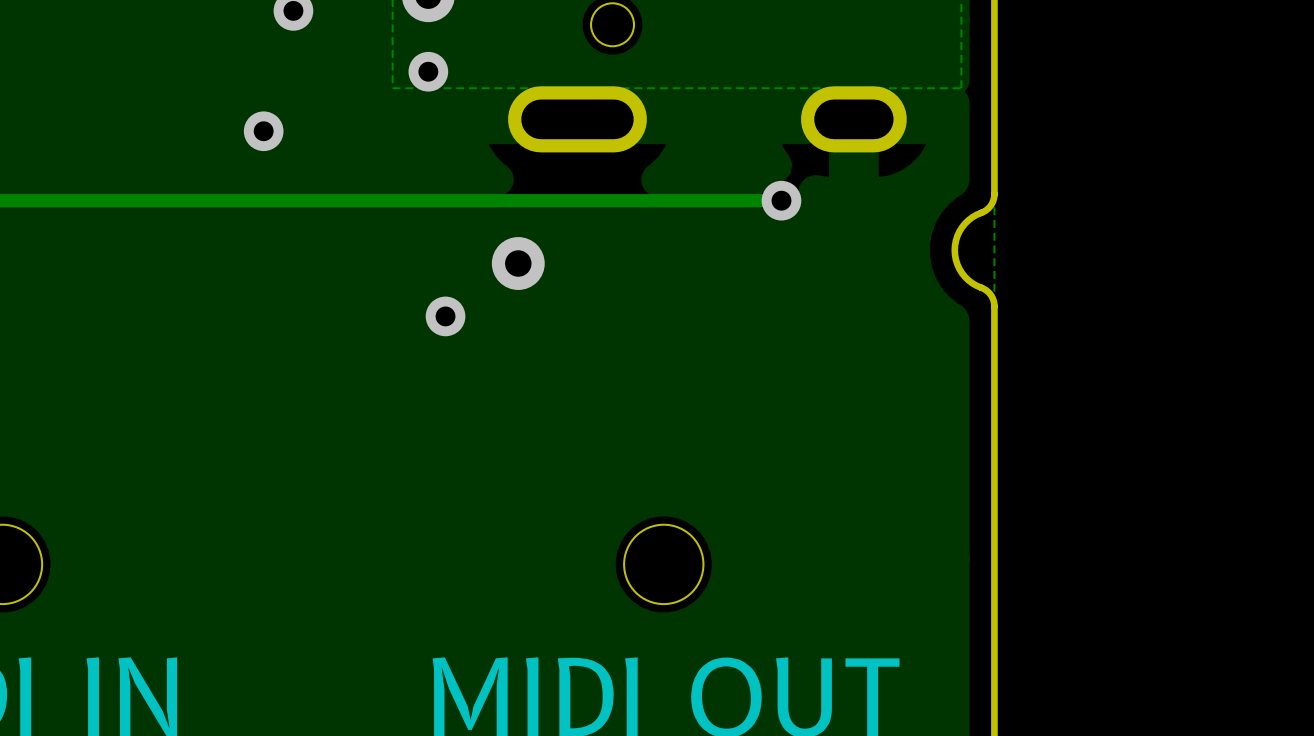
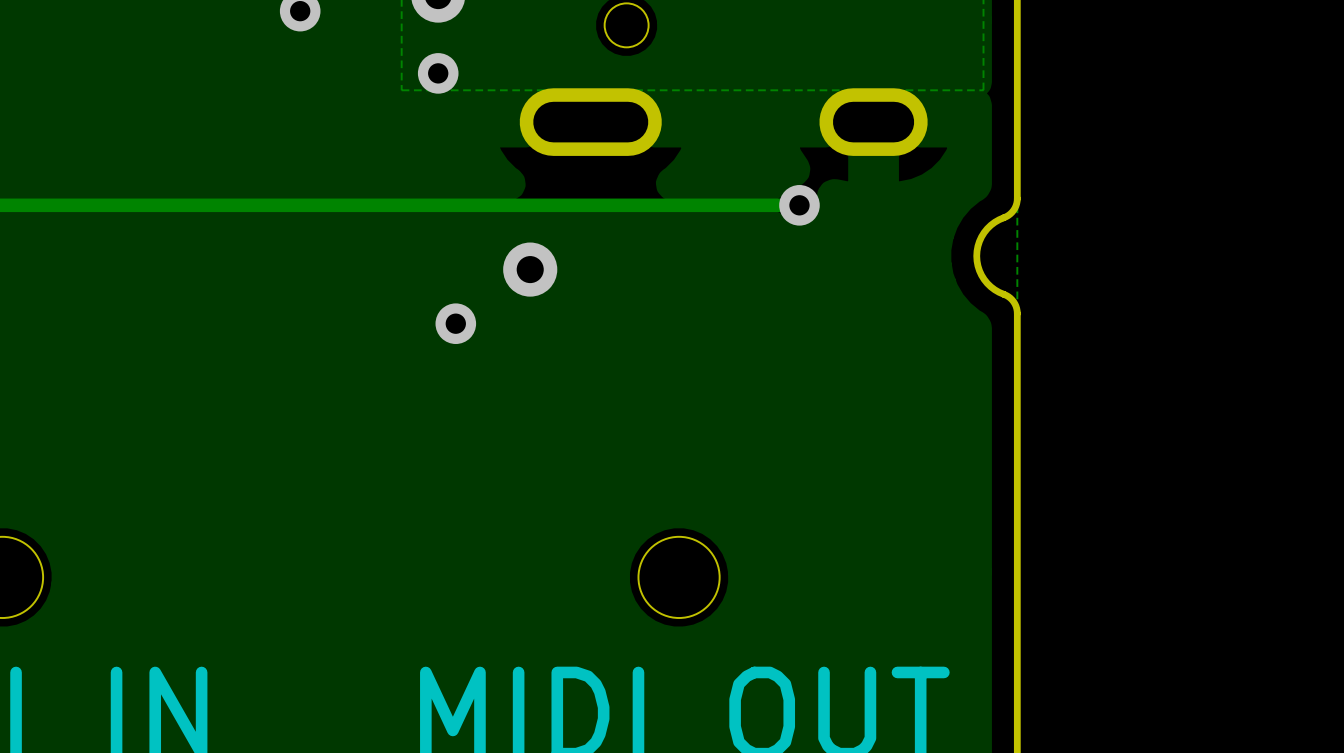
via: (263, 131) -> none

